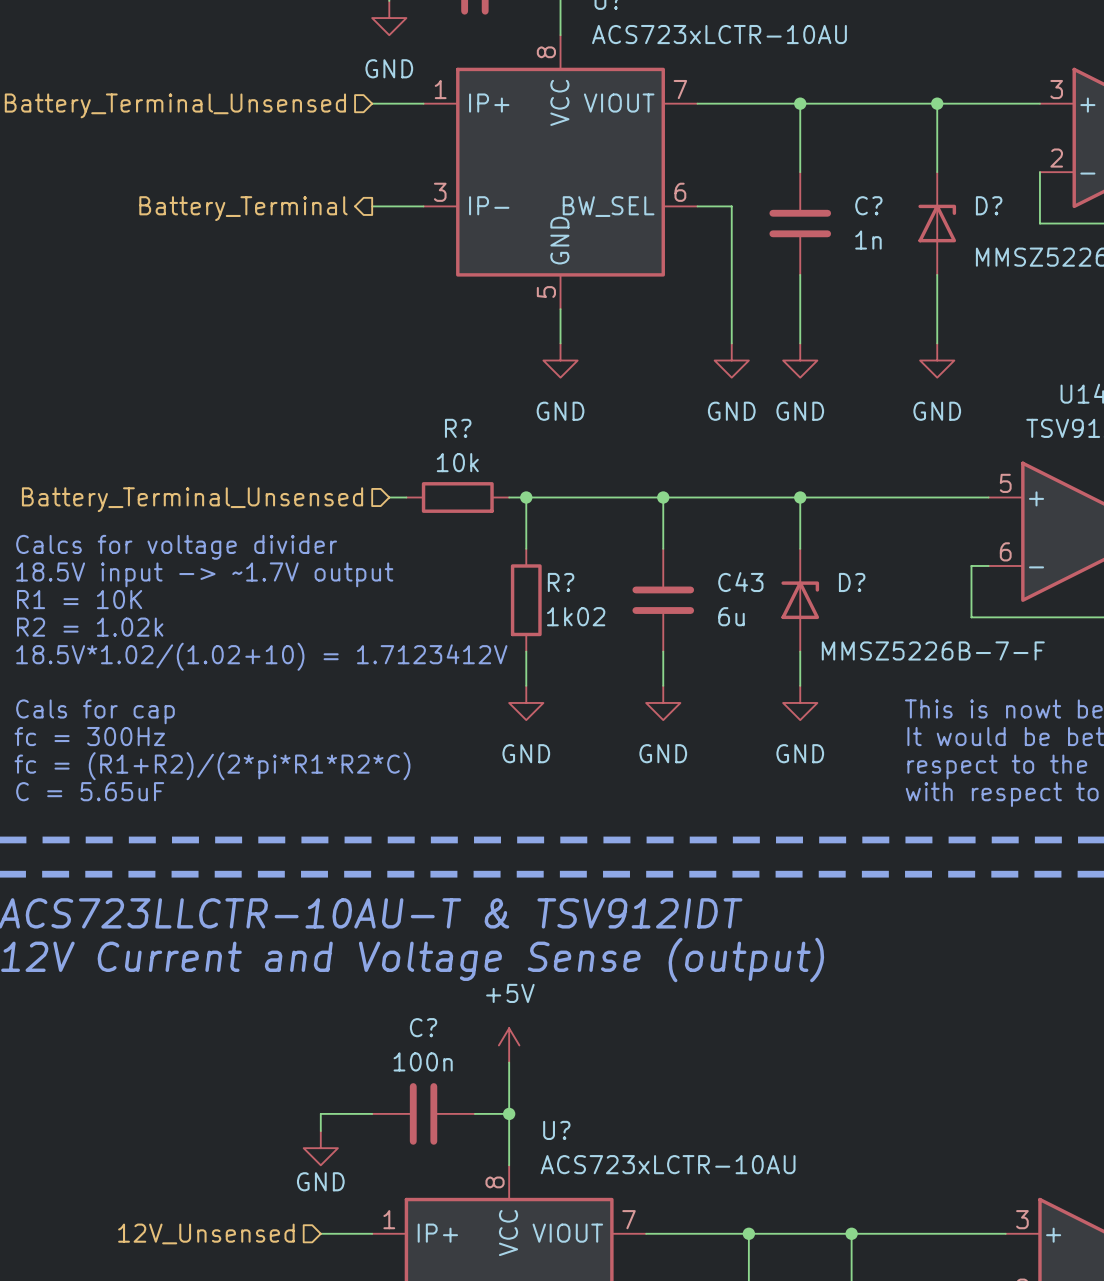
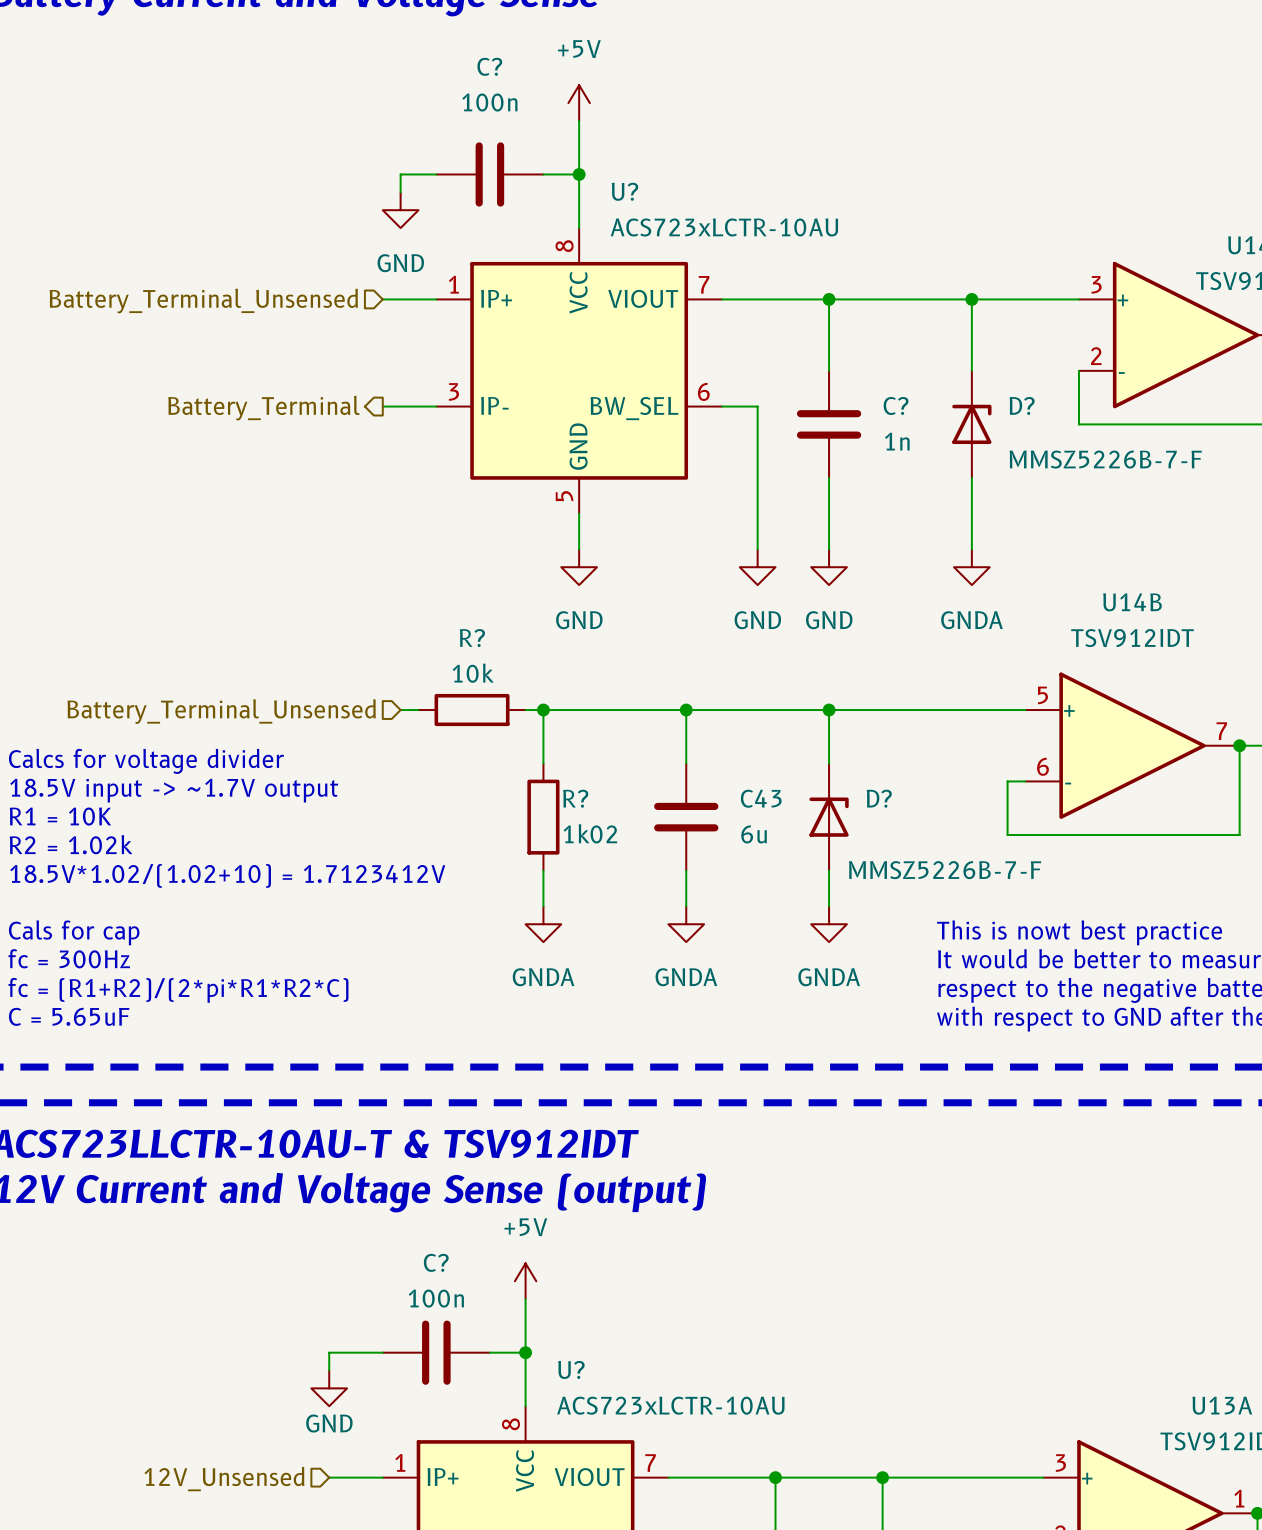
power symbol: GND (937, 360) -> GNDA (971, 567)
power symbol: GND (526, 702) -> GNDA (543, 924)
power symbol: GND (663, 702) -> GNDA (686, 924)
power symbol: GND (800, 702) -> GNDA (829, 924)

